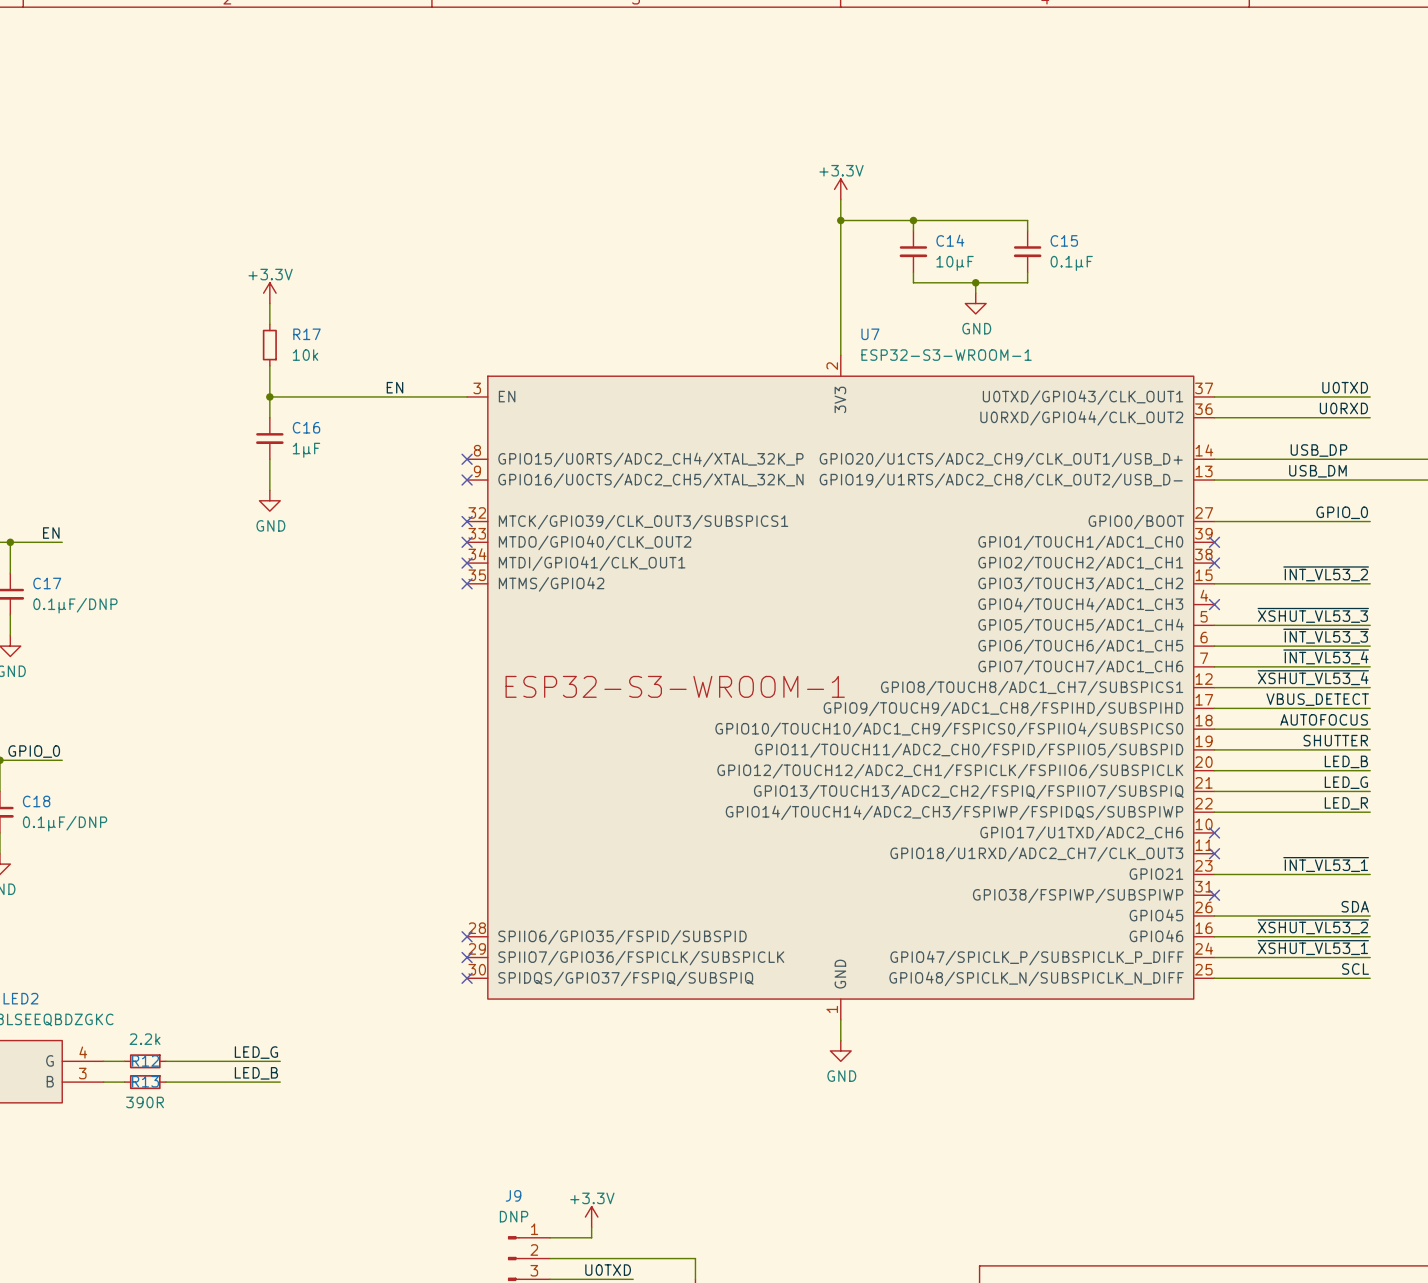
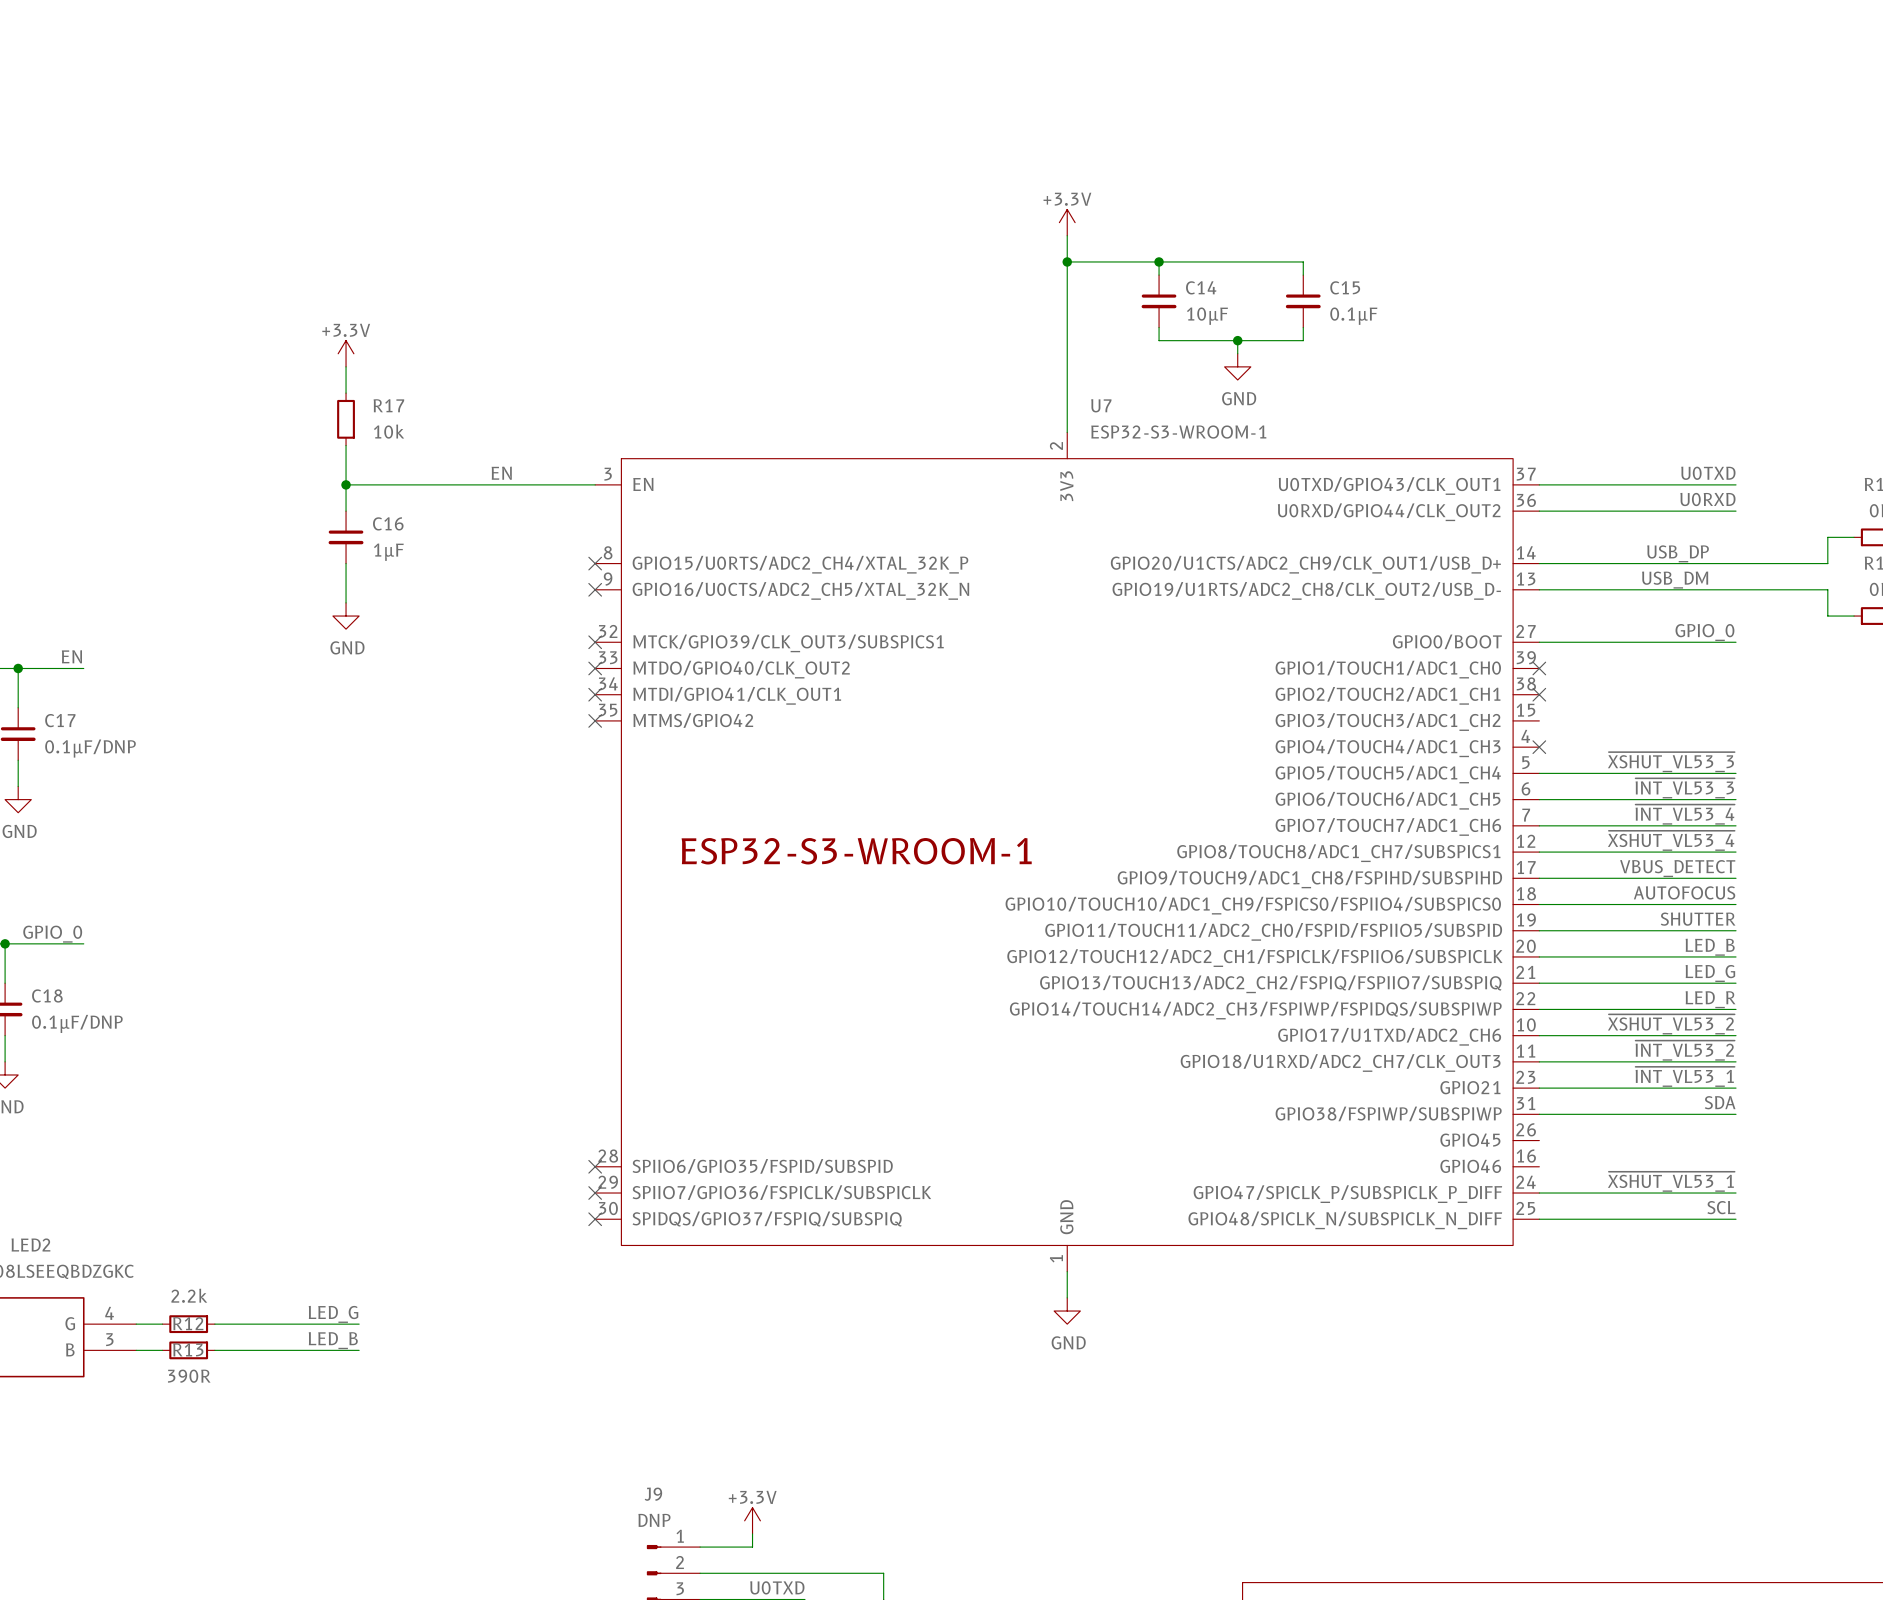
label: ~{INT_VL53_2} (1326, 573) -> none
wire: (1214, 583) (1370, 583) -> none
no-connect mark: (1214, 832) -> none
label: none -> ~{INT_VL53_2} (1685, 1050)
no-connect mark: (1214, 853) -> none
wire: none -> (1539, 1114) (1736, 1114)
no-connect mark: (1214, 895) -> none
label position: SDA (1355, 906) -> SDA (1720, 1102)
wire: (1214, 916) (1370, 916) -> (1539, 1035) (1736, 1035)
label position: ~{XSHUT_VL53_2} (1313, 926) -> ~{XSHUT_VL53_2} (1671, 1024)
wire: (1214, 936) (1370, 936) -> (1539, 1061) (1736, 1061)

